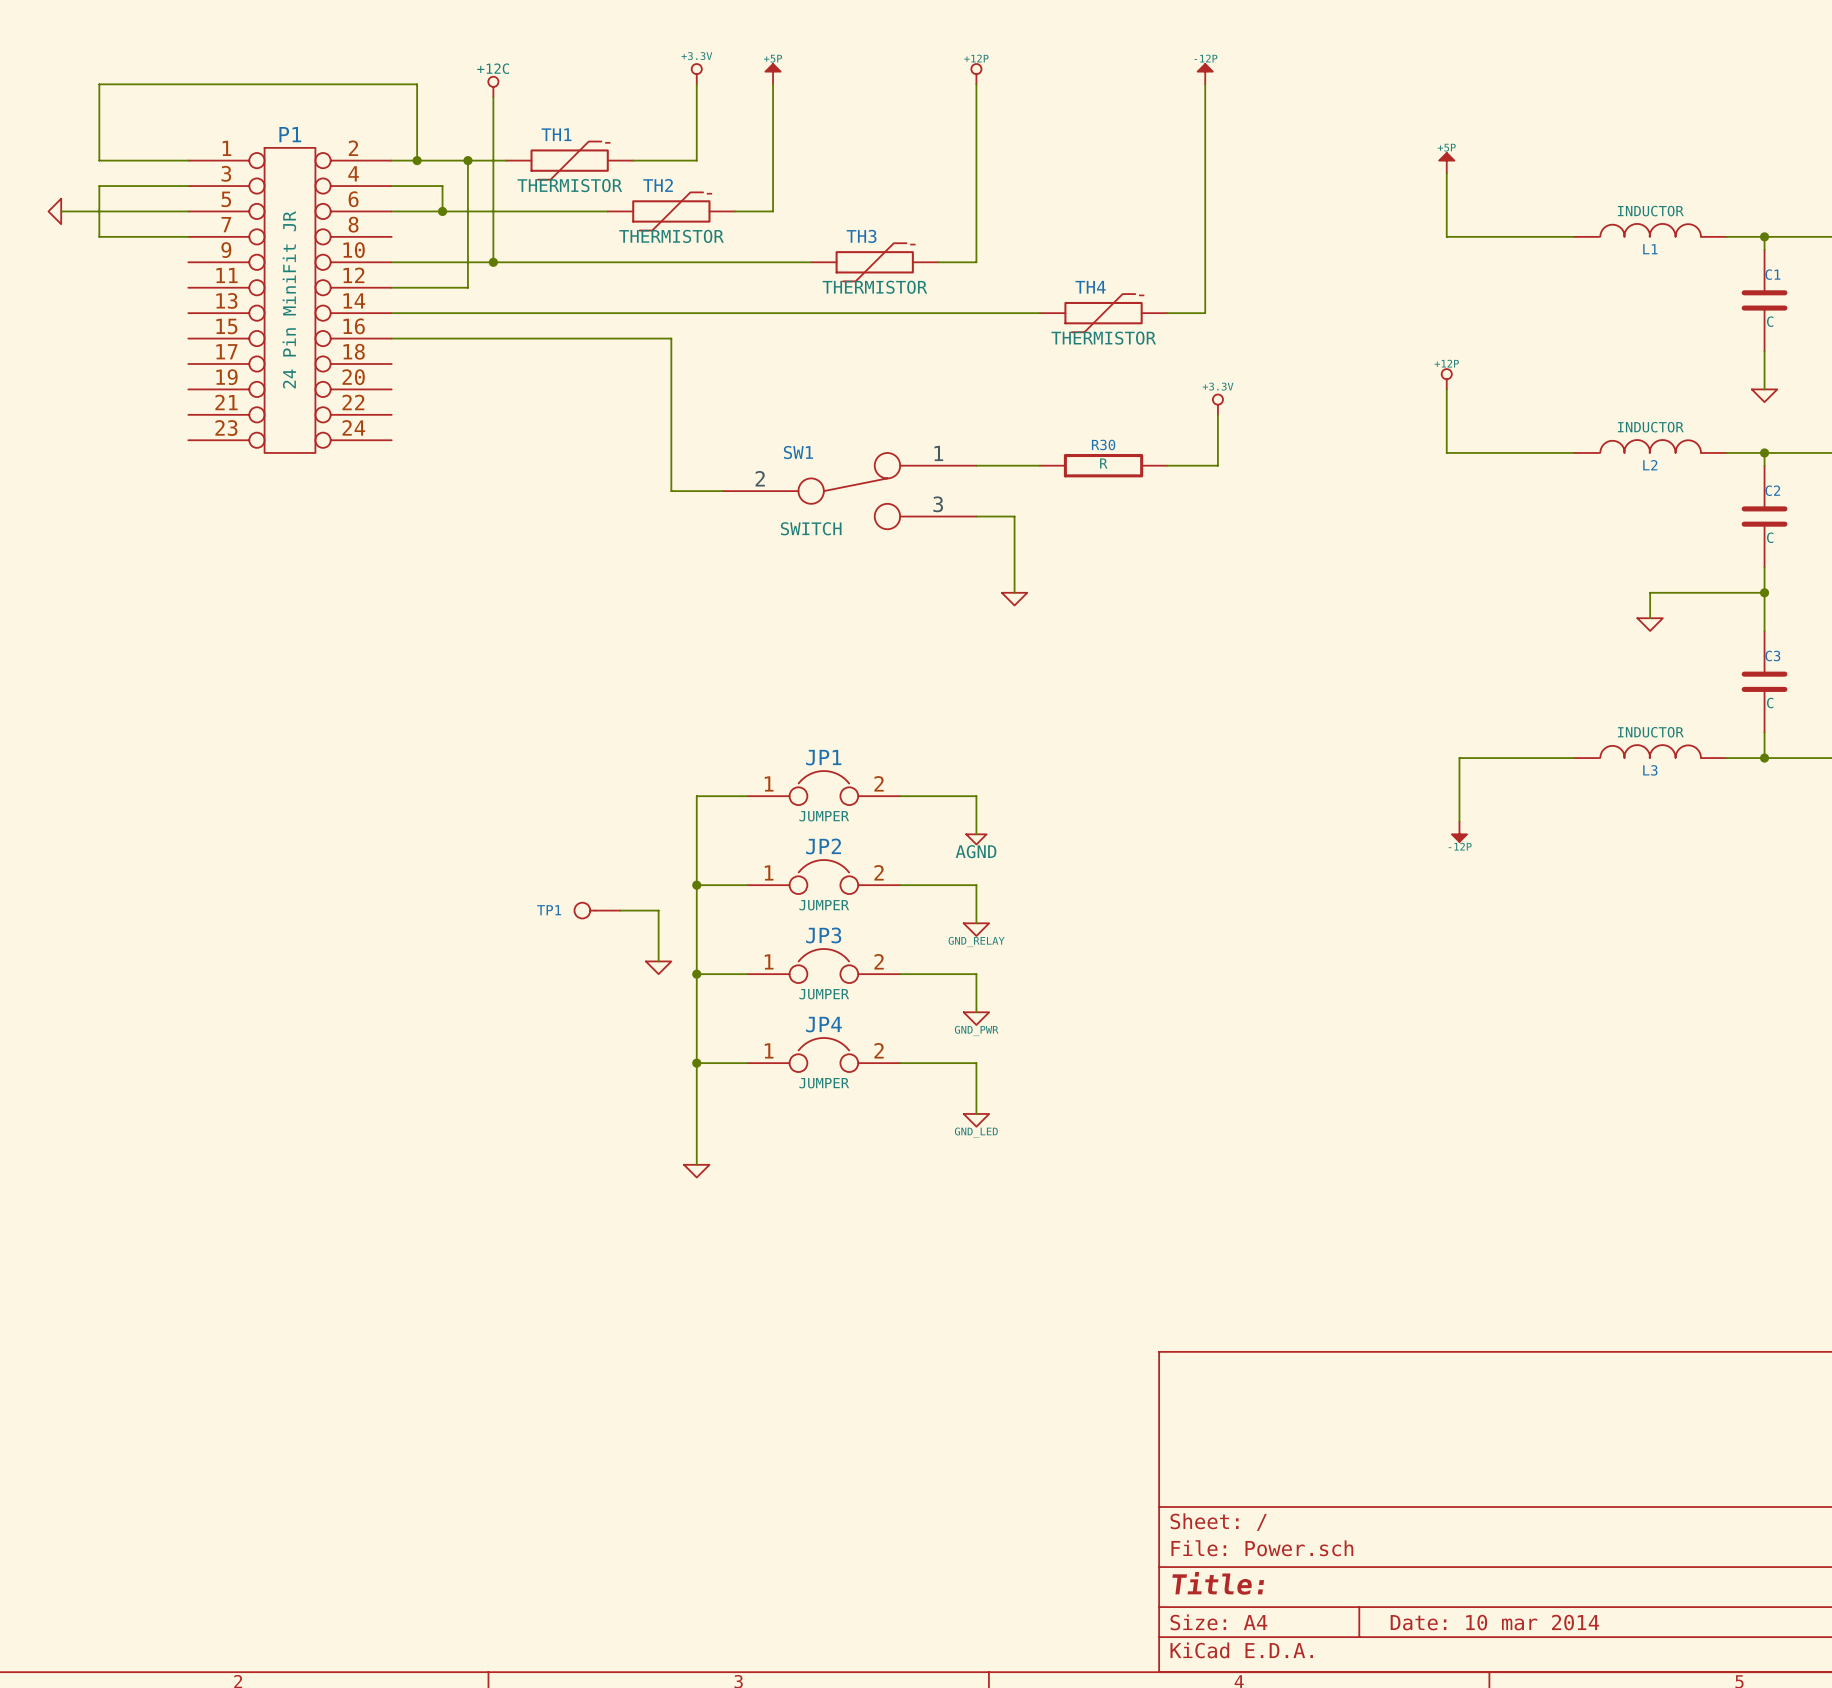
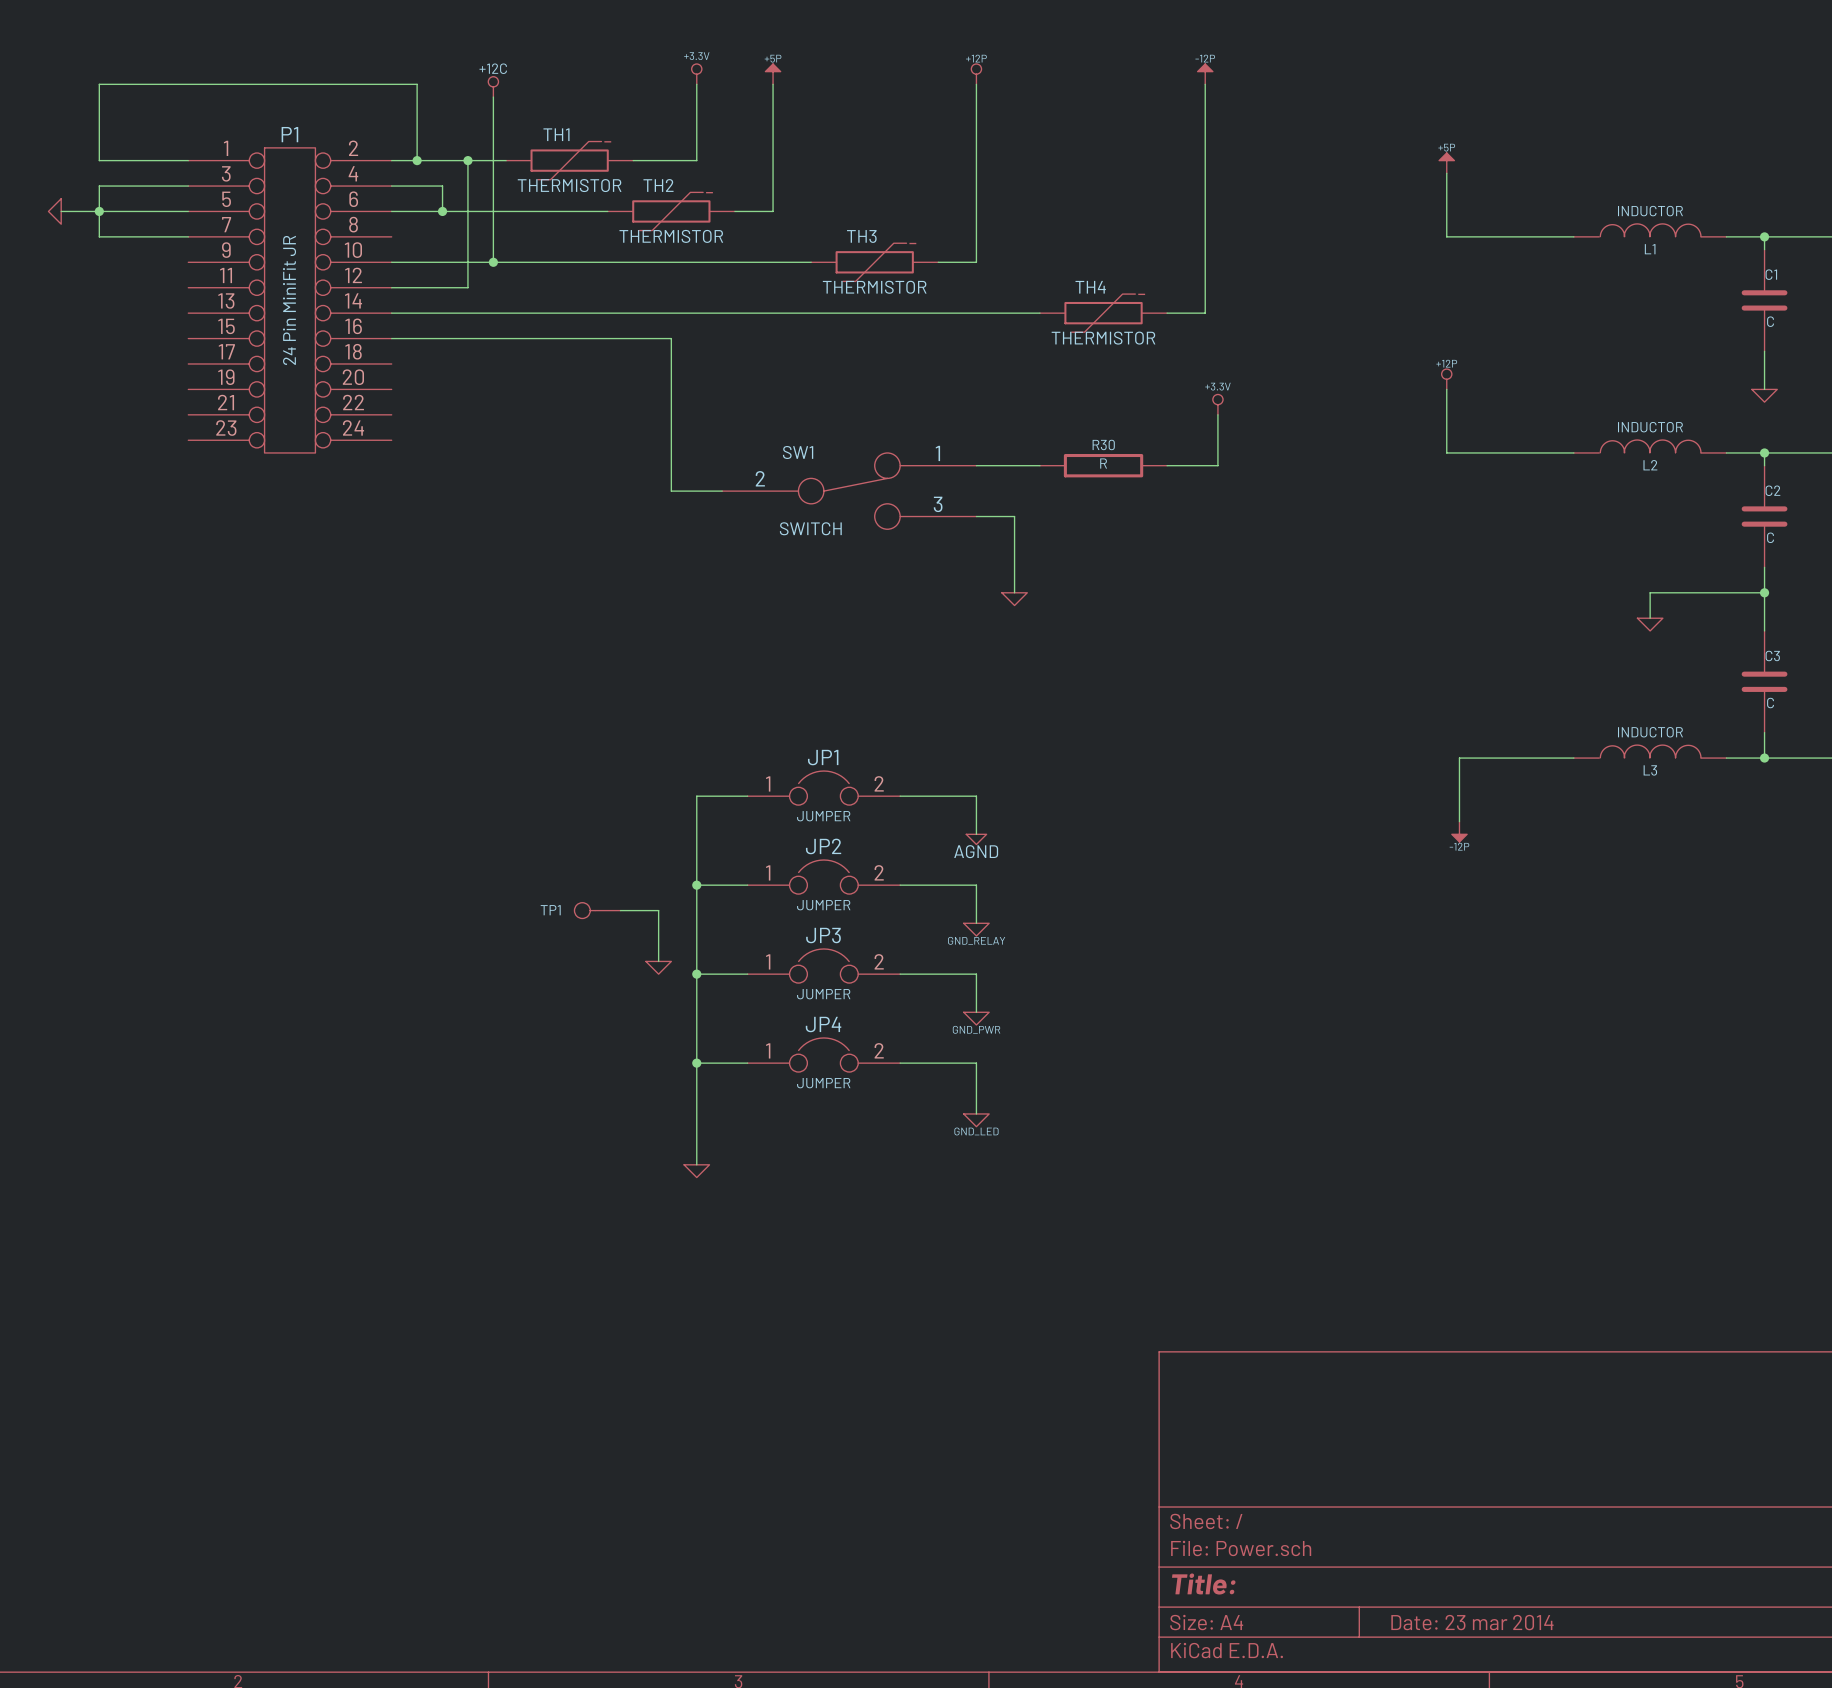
junction: none -> (99, 211)
title block: Date: 10 mar 2014 (1494, 1622) -> Date: 23 mar 2014 (1472, 1622)

